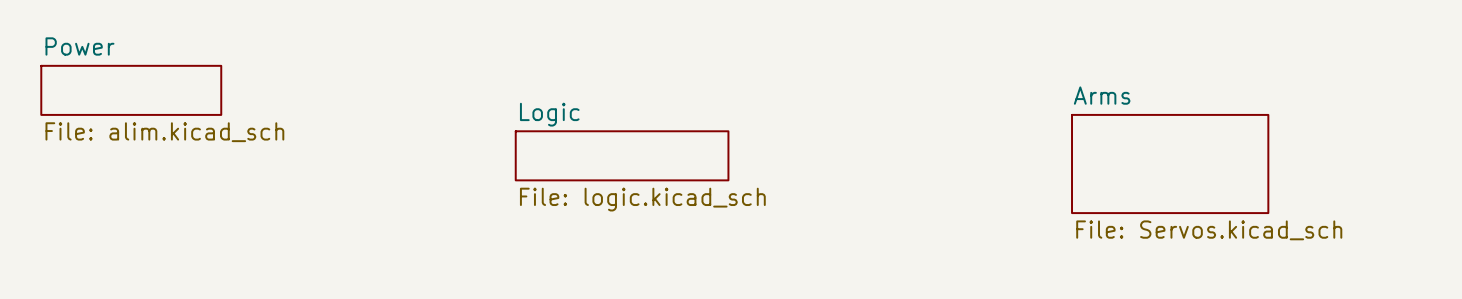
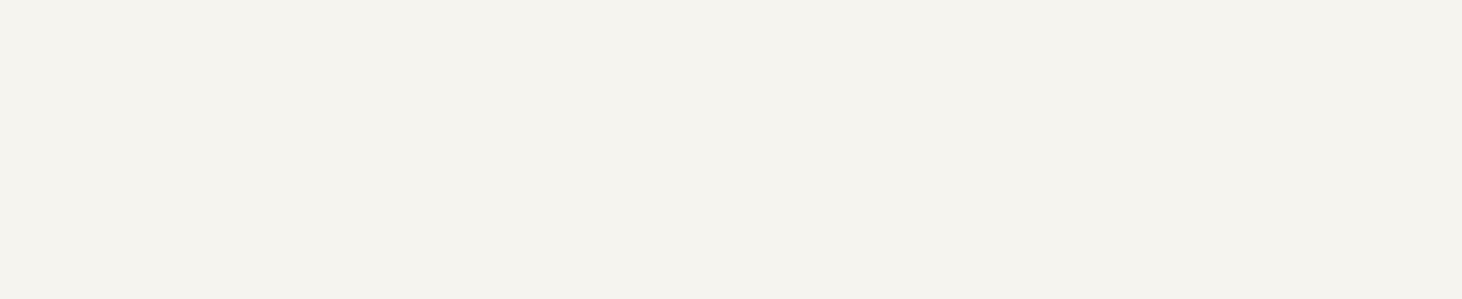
sheet Power: File: alim.kicad_sch (131, 90) -> none
sheet Logic: File: logic.kicad_sch (622, 155) -> none
sheet Arms: File: Servos.kicad_sch (1170, 164) -> none

